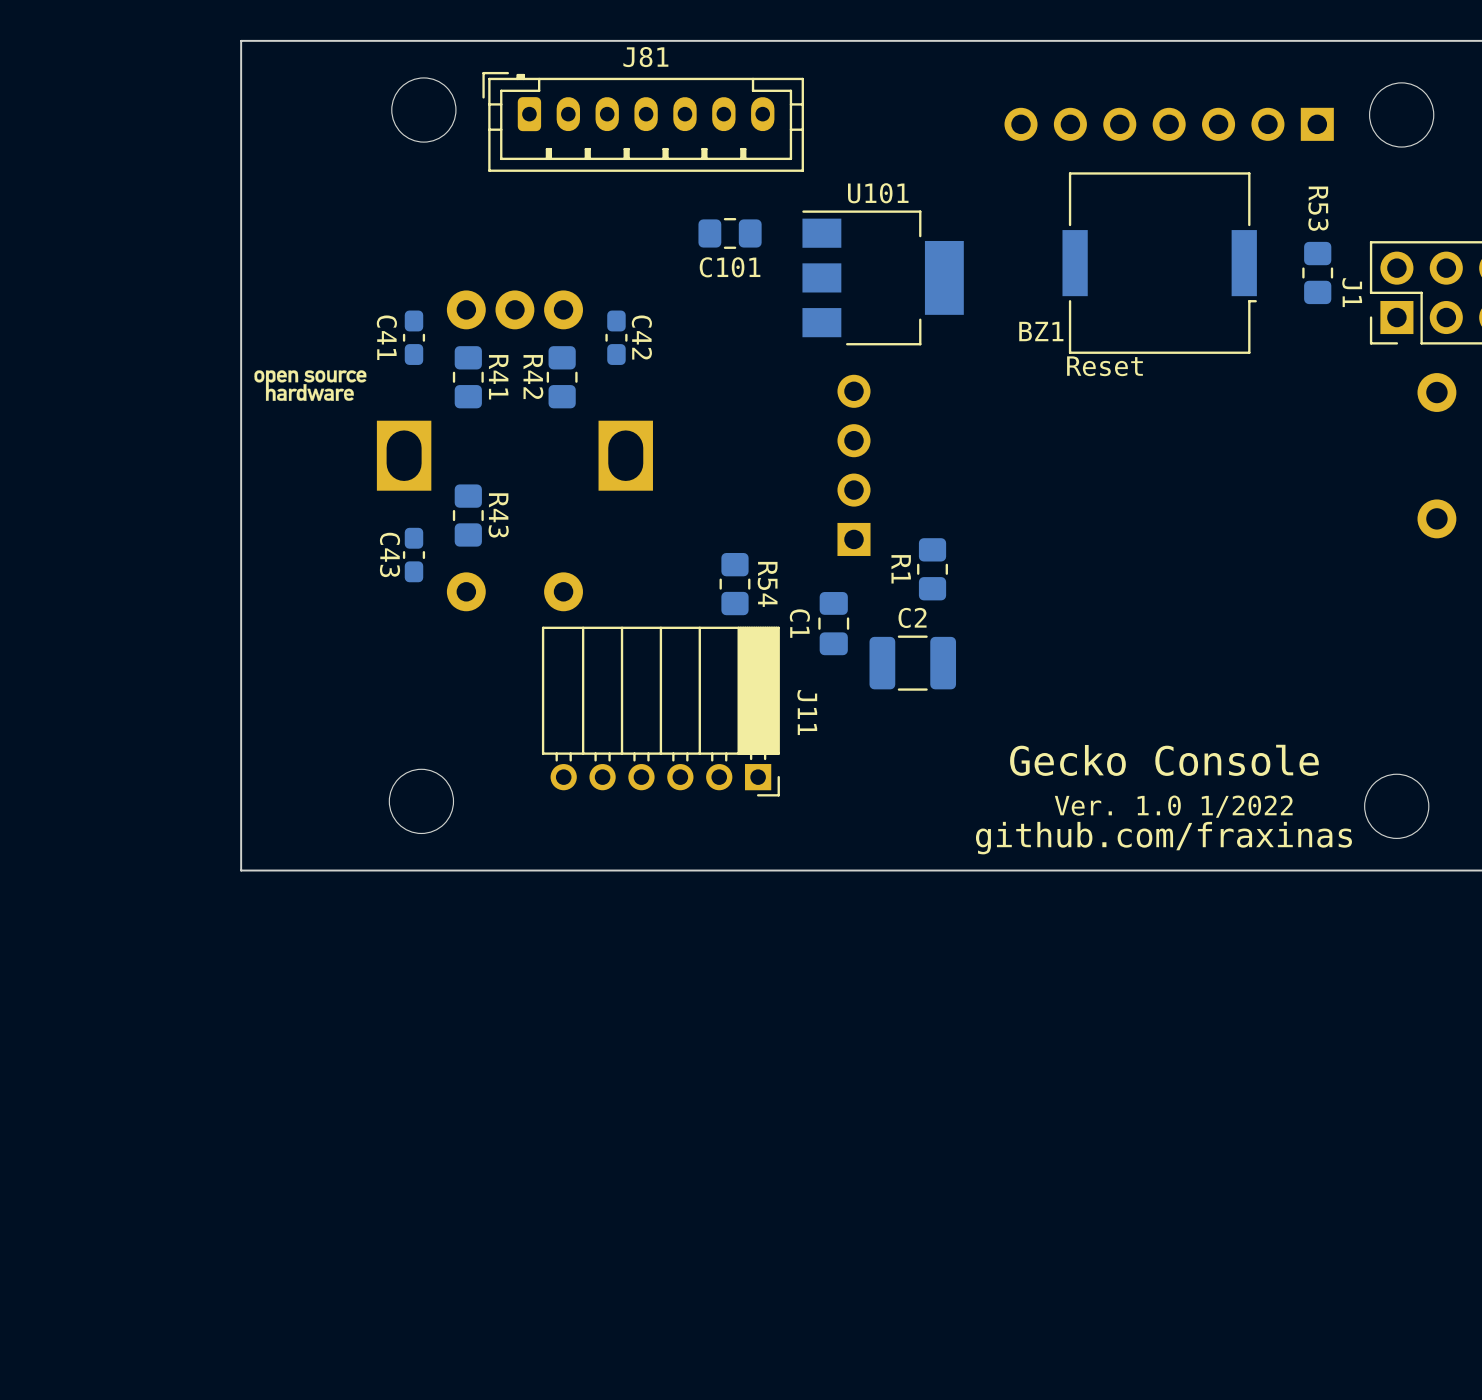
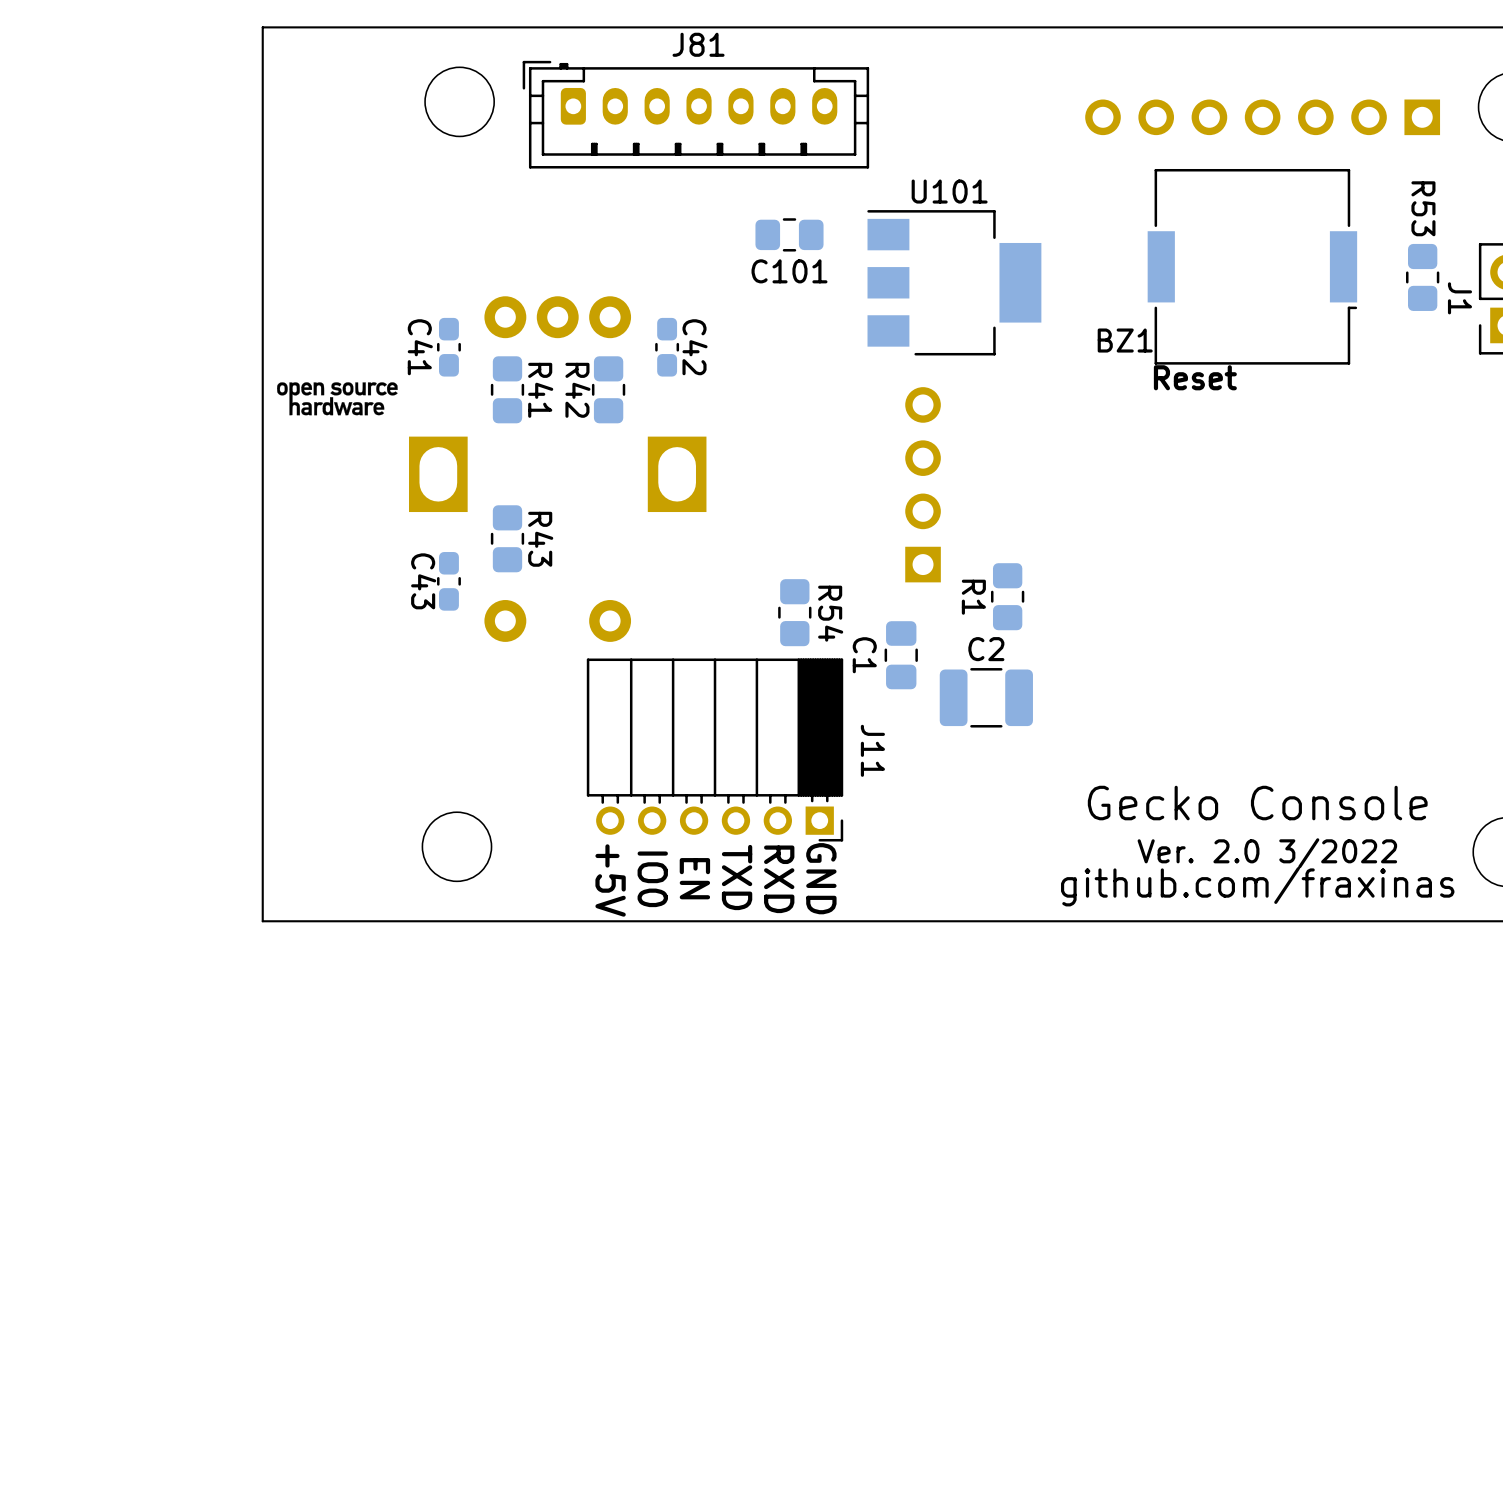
text: Ver. 1.0 1/2022 (1173, 806) -> Ver. 2.0 3/2022 (1267, 853)
text: none -> TXD (737, 877)
text: none -> GND (821, 878)
text: none -> +5V (610, 880)
text: none -> IO0 (652, 879)
text: none -> EN (694, 878)
text: none -> RXD (779, 879)

